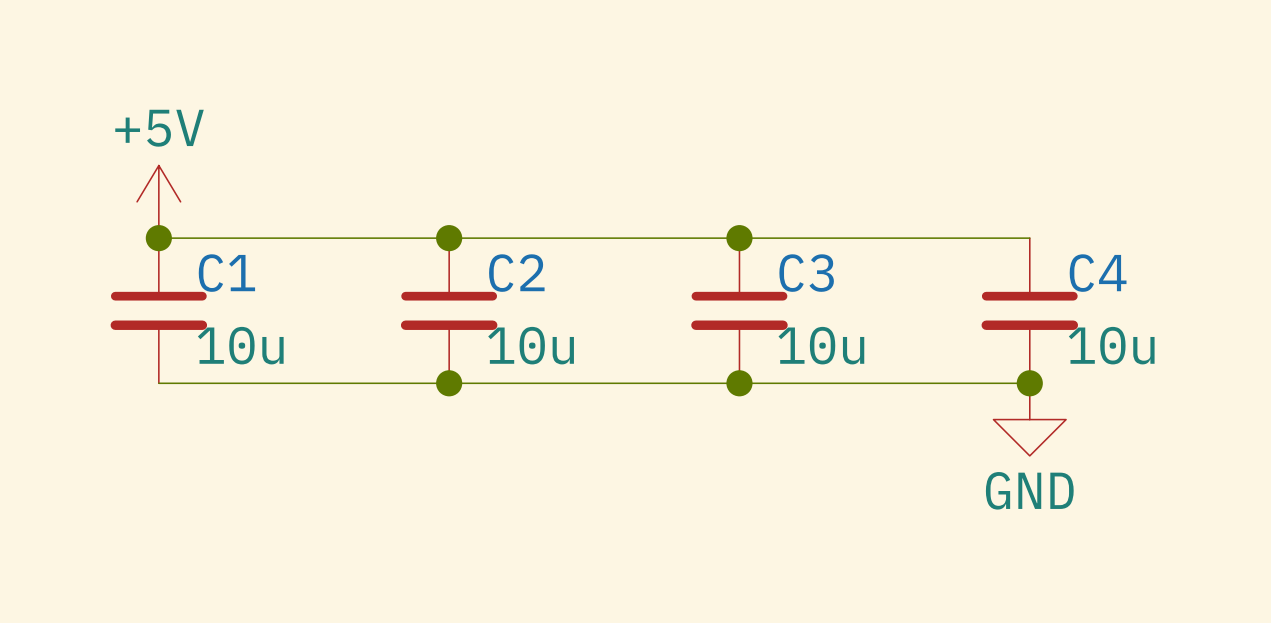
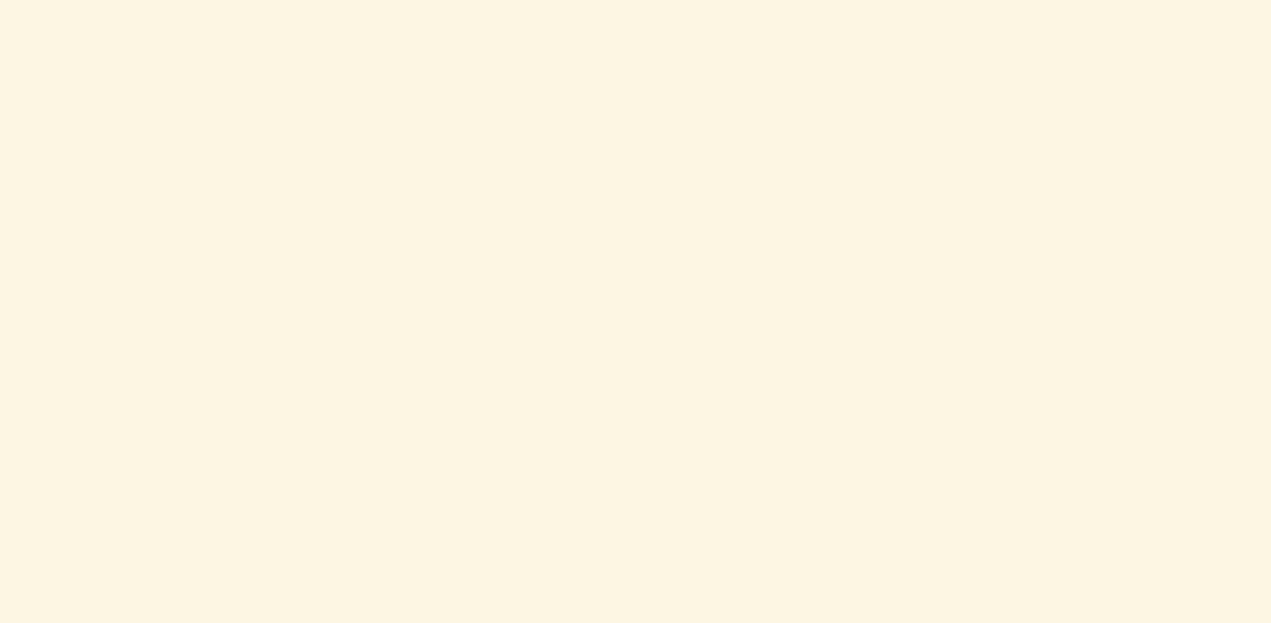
power symbol: +5V (158, 201) -> none
wire: (158, 238) (1029, 238) -> none
junction: (158, 238) -> none
junction: (449, 238) -> none
junction: (739, 238) -> none
C1: 10u (158, 310) -> none
C2: 10u (449, 310) -> none
C3: 10u (739, 310) -> none
C4: 10u (1029, 310) -> none
wire: (158, 383) (1029, 383) -> none
junction: (449, 383) -> none
junction: (739, 383) -> none
junction: (1029, 383) -> none
power symbol: GND (1029, 419) -> none

